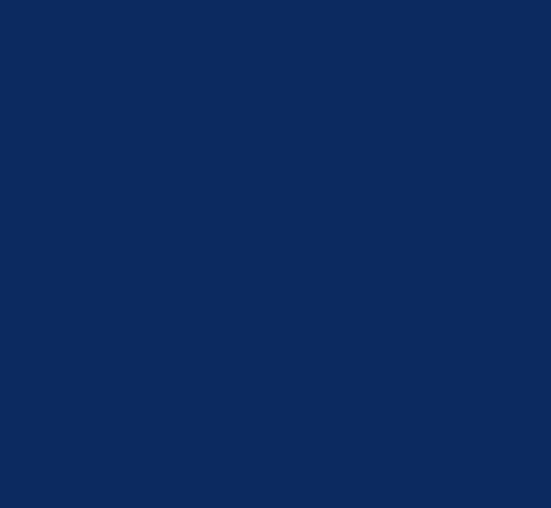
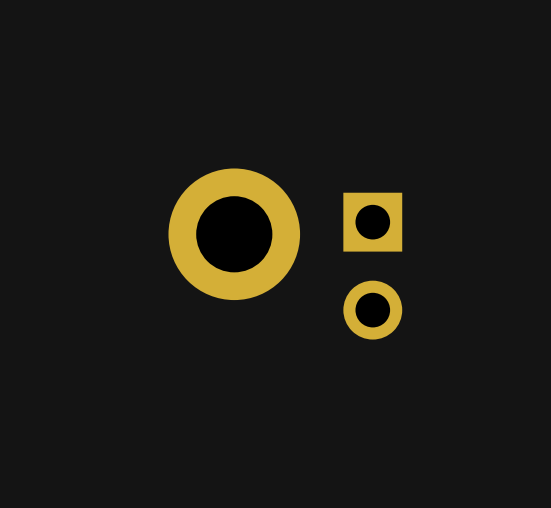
part: none -> (234, 234)
part: none -> (372, 266)

